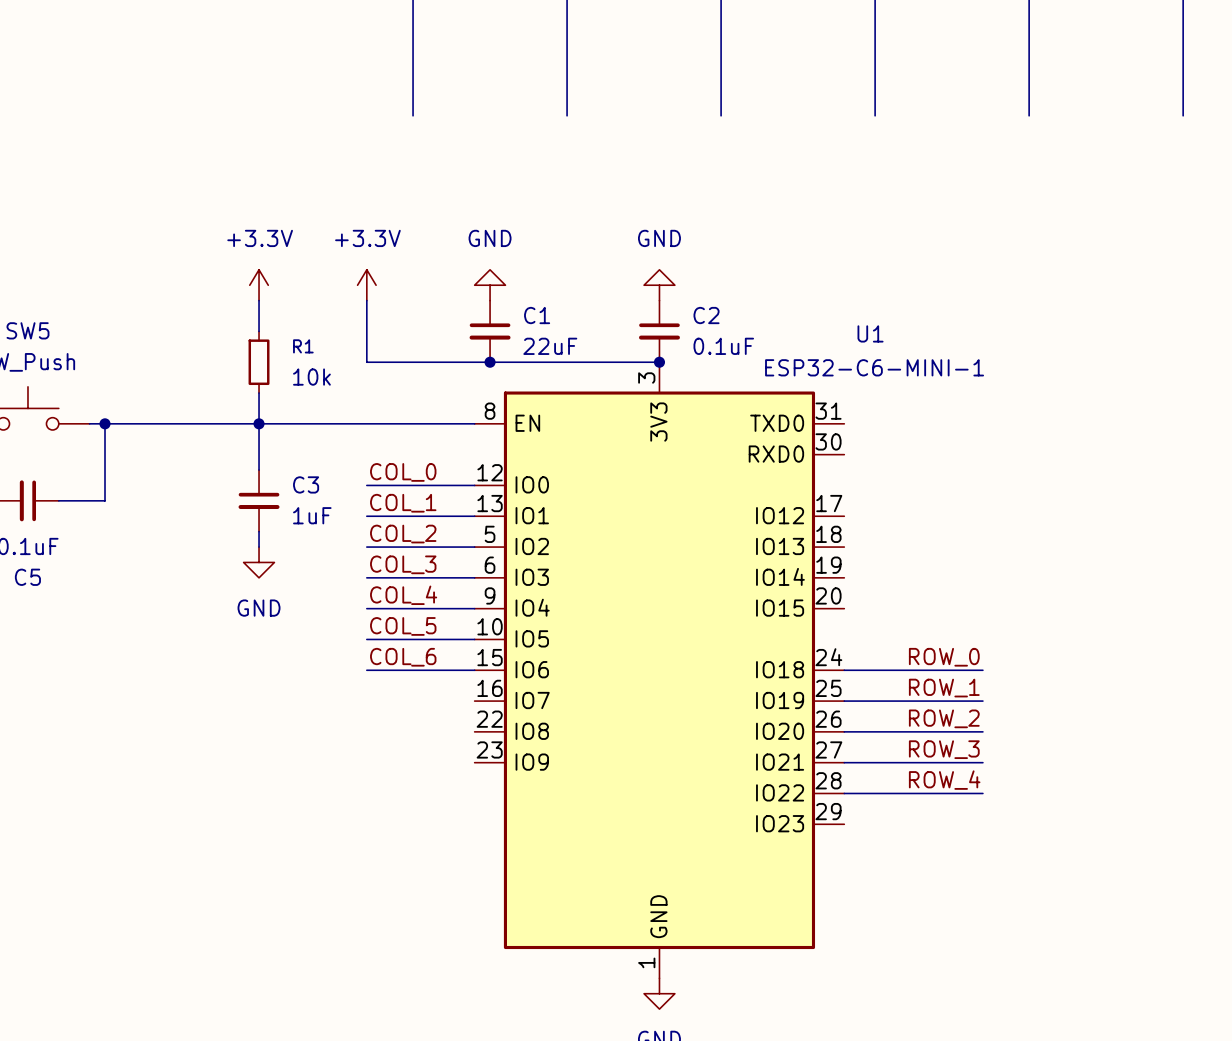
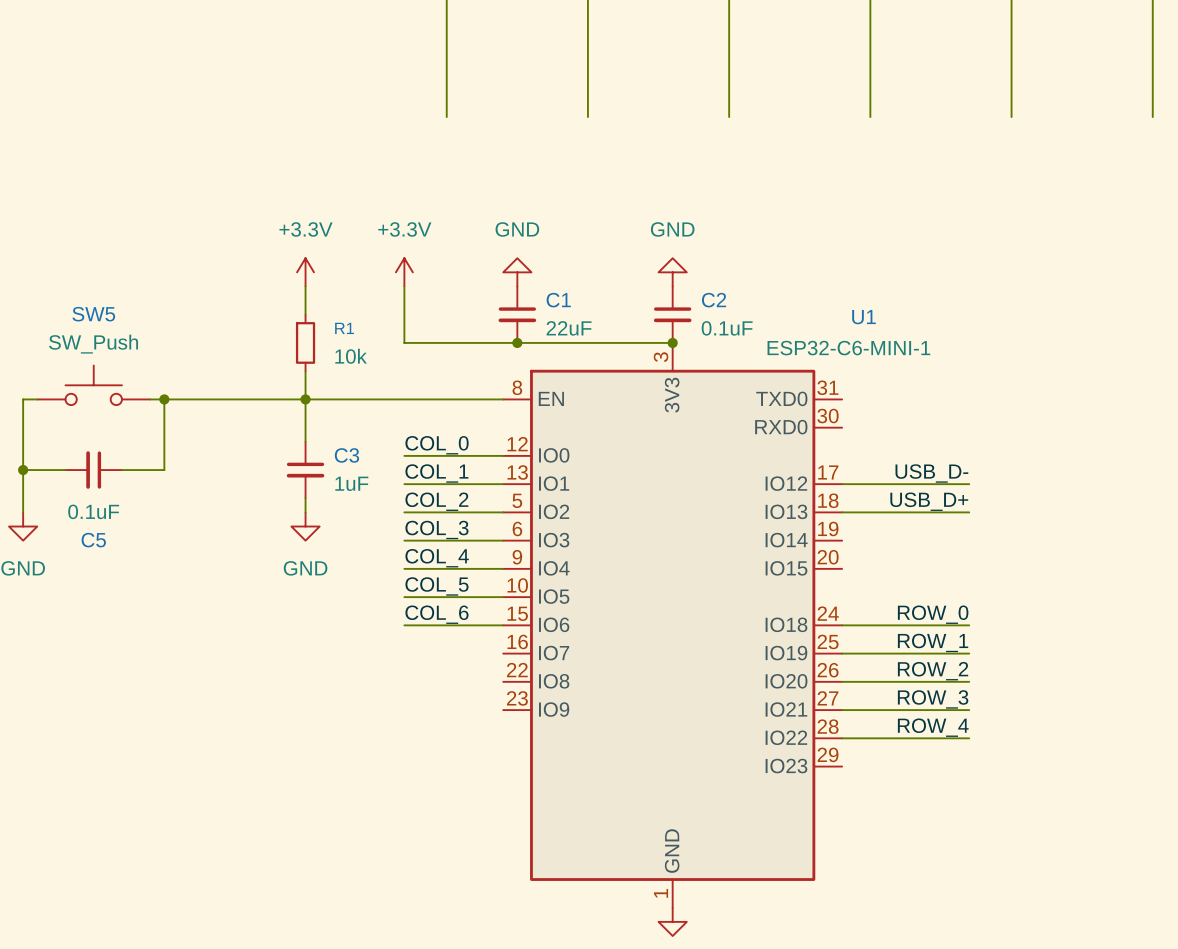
label: none -> USB_D- (931, 473)
wire: none -> (842, 484) (969, 484)
label: none -> USB_D+ (929, 501)
wire: none -> (842, 512) (969, 512)

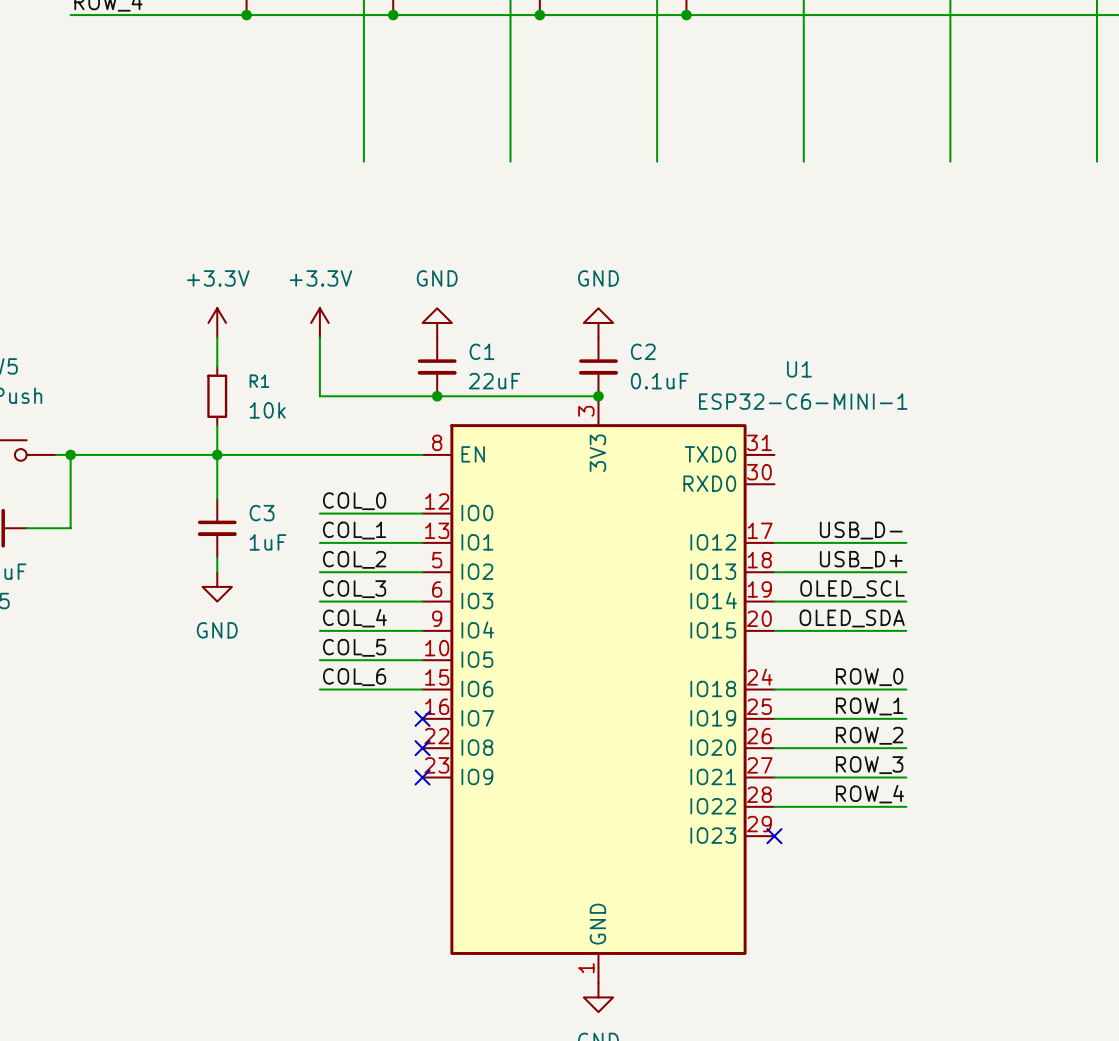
label: none -> OLED_SCL (852, 589)
wire: none -> (774, 601) (906, 601)
label: none -> OLED_SDA (852, 618)
wire: none -> (774, 630) (906, 630)
no-connect mark: none -> (422, 718)
no-connect mark: none -> (422, 748)
no-connect mark: none -> (422, 777)
no-connect mark: none -> (774, 836)

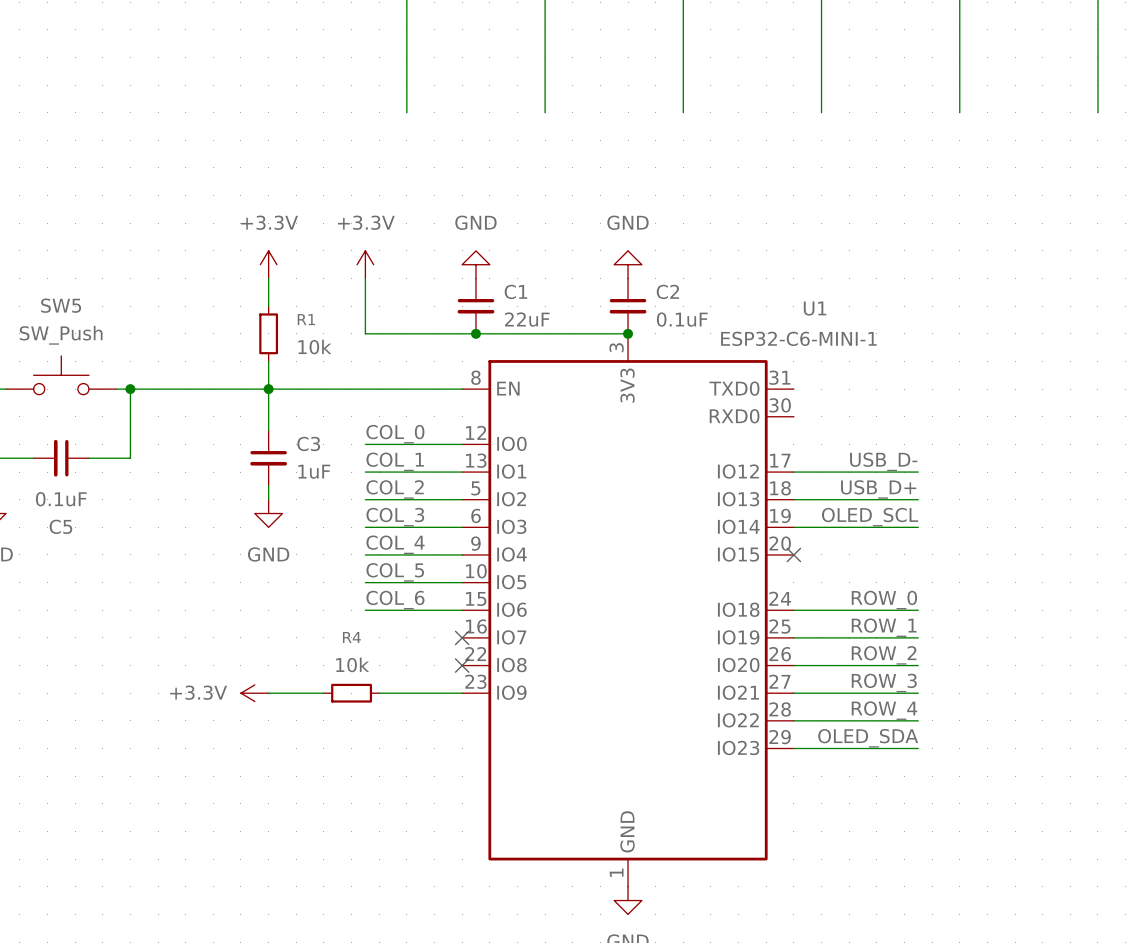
label position: OLED_SDA (852, 618) -> OLED_SDA (868, 738)
wire: (774, 630) (906, 630) -> (793, 748) (918, 748)
no-connect mark: none -> (793, 554)
power symbol: none -> +3.3V (254, 693)
wire: none -> (268, 693) (323, 693)
R4: none -> 10k (351, 693)
wire: none -> (379, 693) (462, 693)
no-connect mark: (422, 777) -> none
no-connect mark: (774, 836) -> none

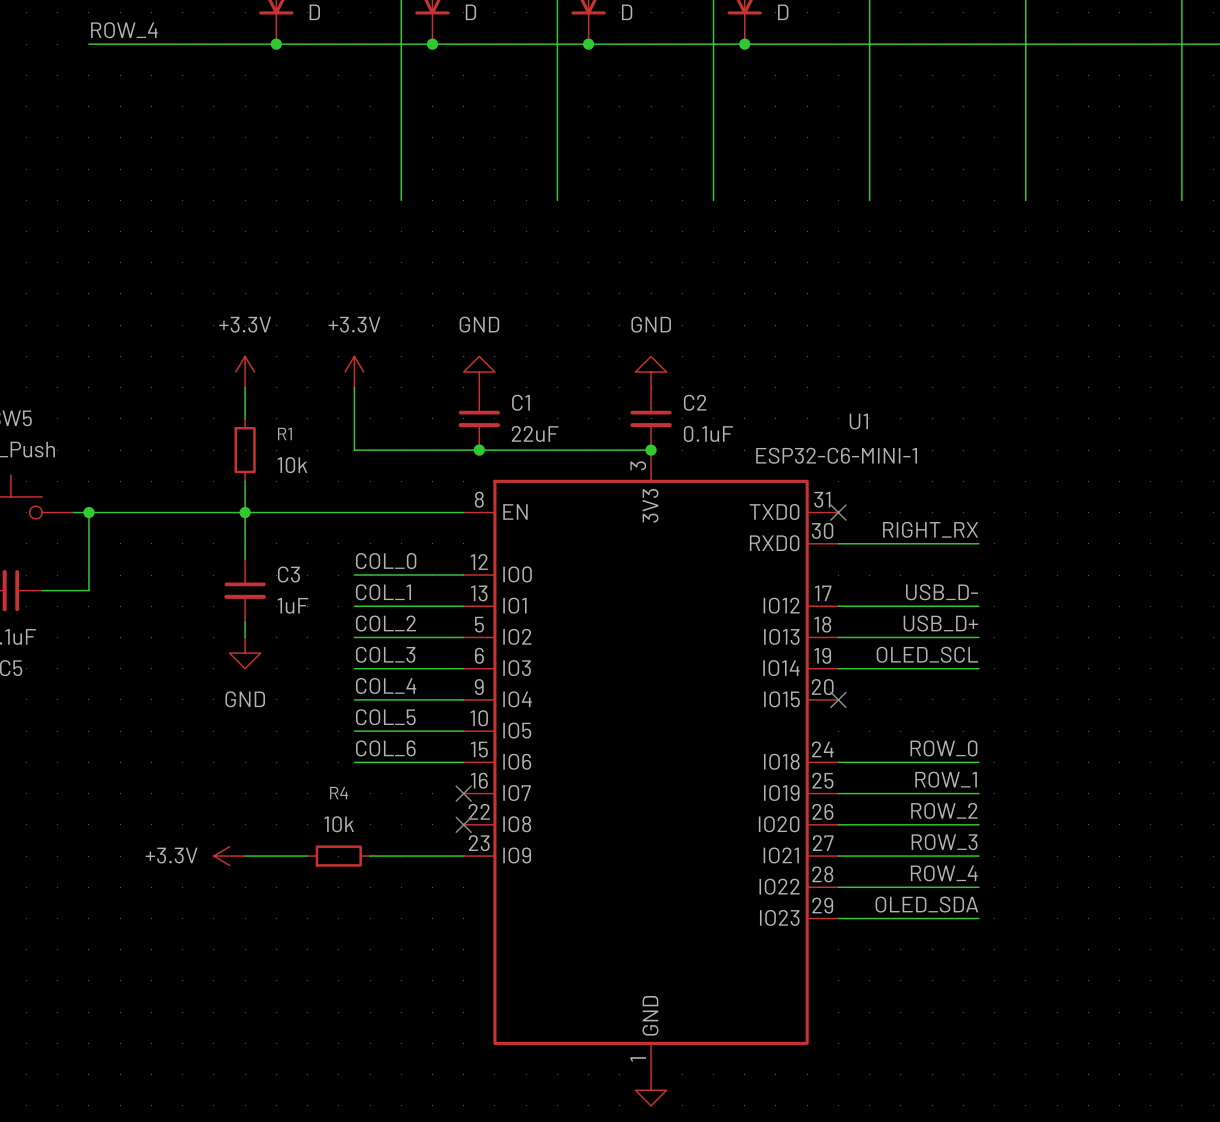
no-connect mark: none -> (838, 512)
label: none -> RIGHT_RX (930, 529)
wire: none -> (838, 543) (978, 543)

